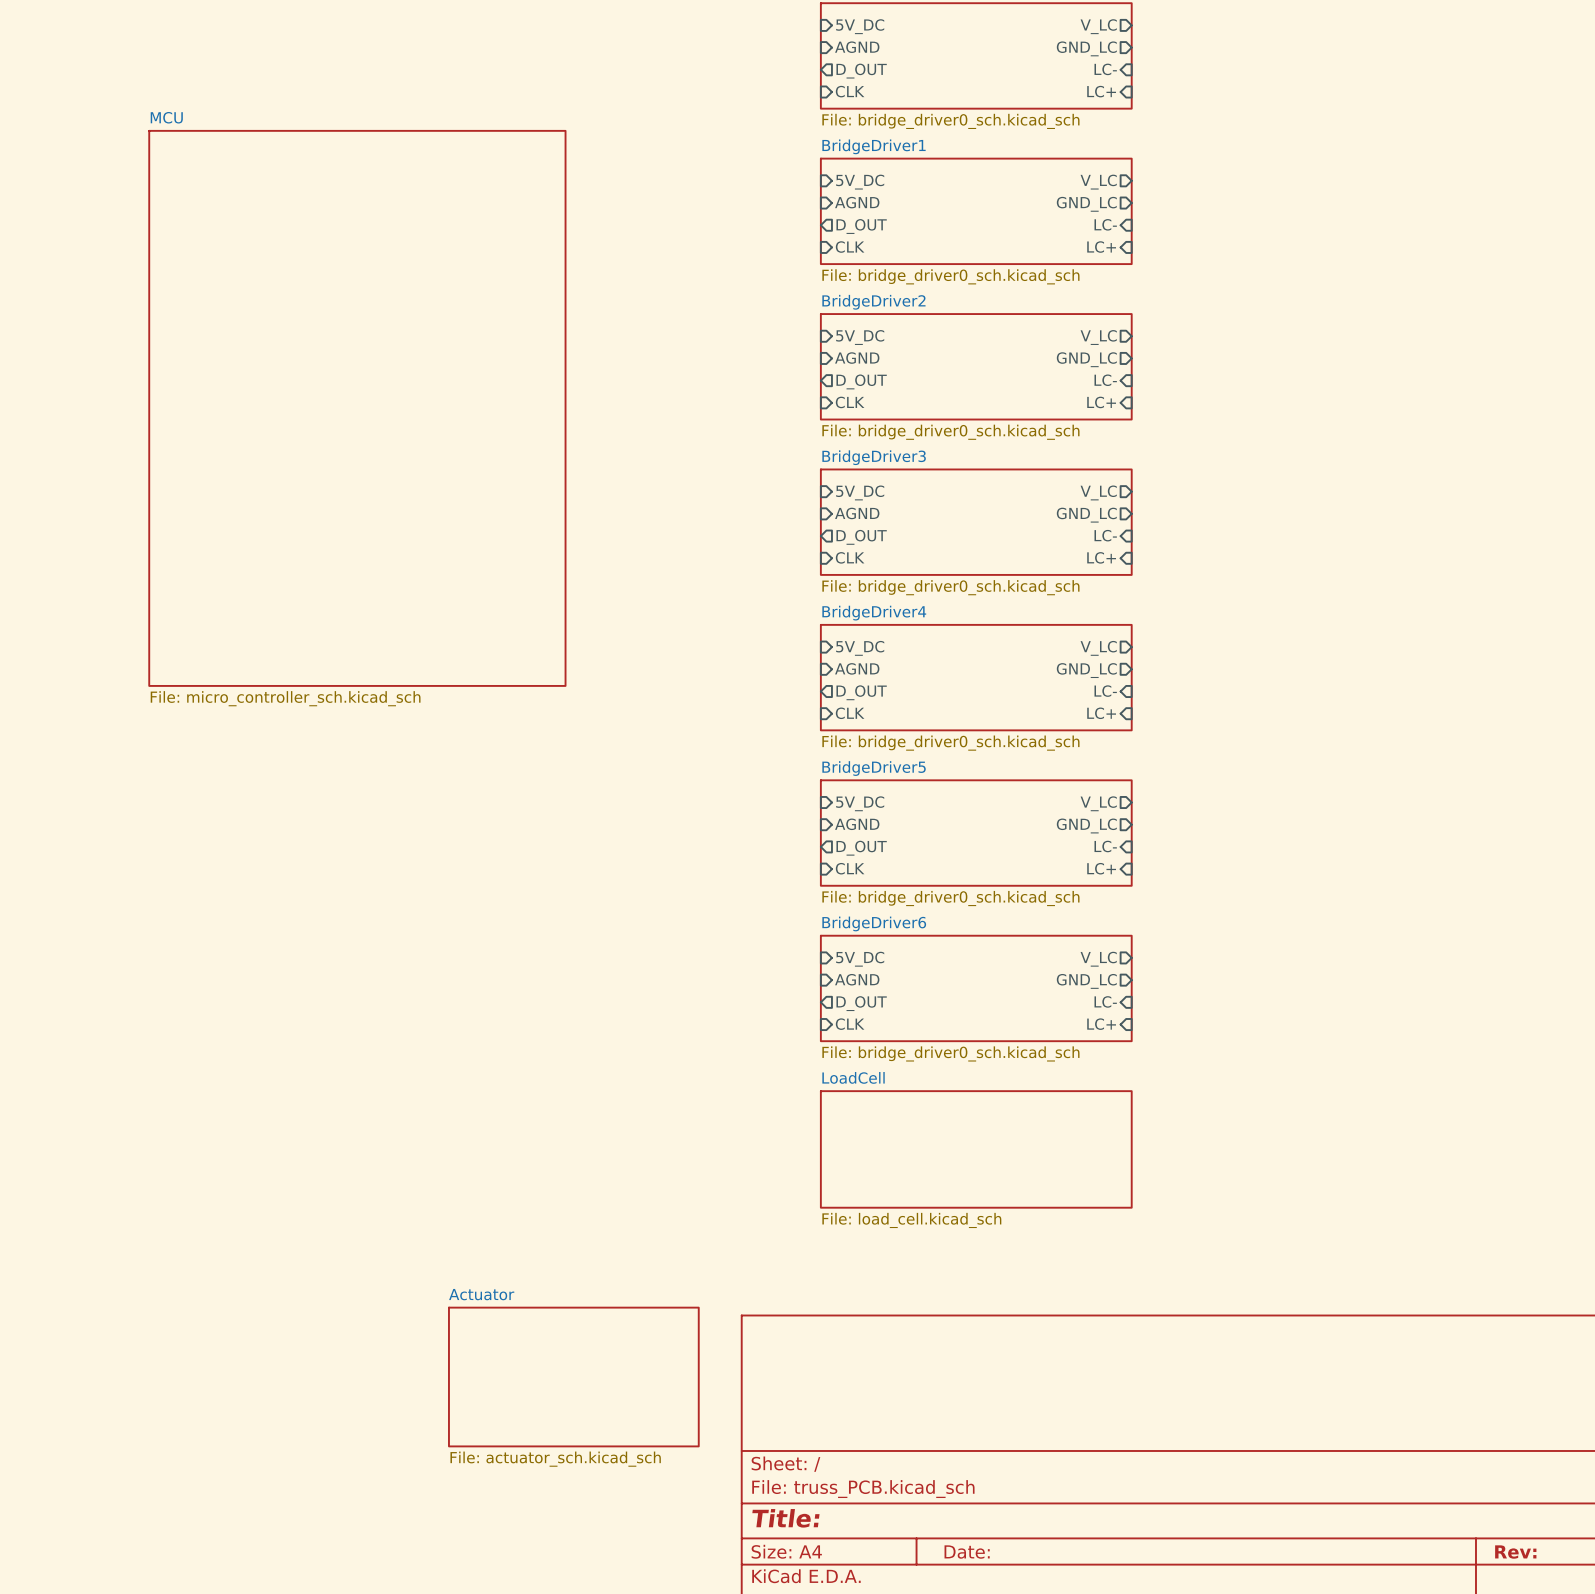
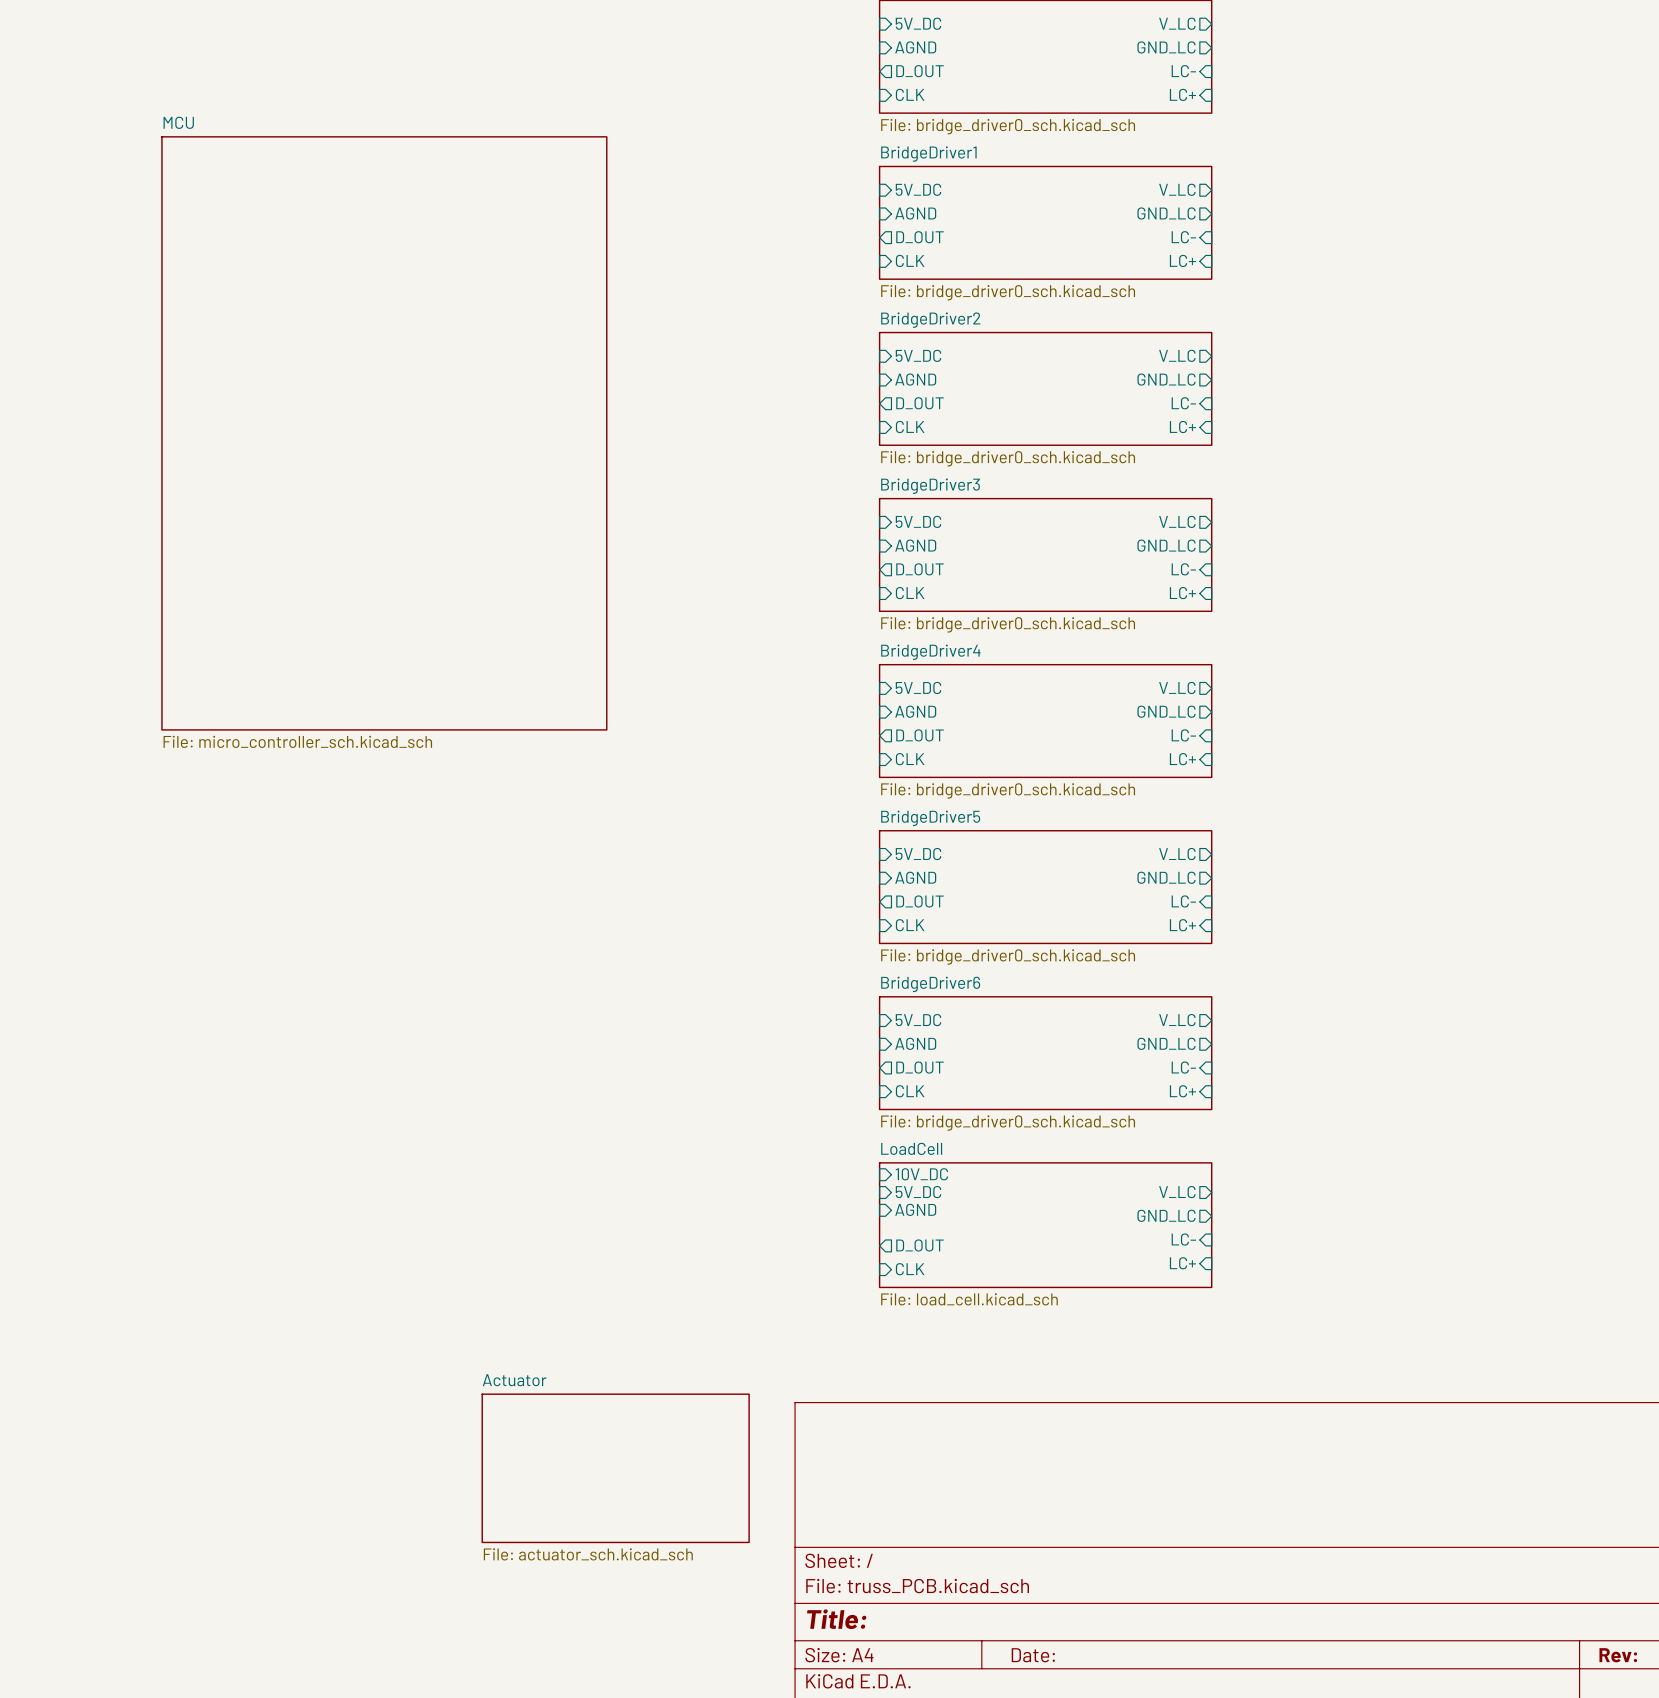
sheet pin: none -> 10V_DC (921, 1174)
sheet pin: none -> 5V_DC (918, 1192)
sheet pin: none -> V_LC (1177, 1192)
sheet pin: none -> AGND (915, 1209)
sheet pin: none -> GND_LC (1166, 1215)
sheet pin: none -> LC- (1183, 1239)
sheet pin: none -> D_OUT (920, 1245)
sheet pin: none -> LC+ (1182, 1263)
sheet pin: none -> CLK (910, 1269)

